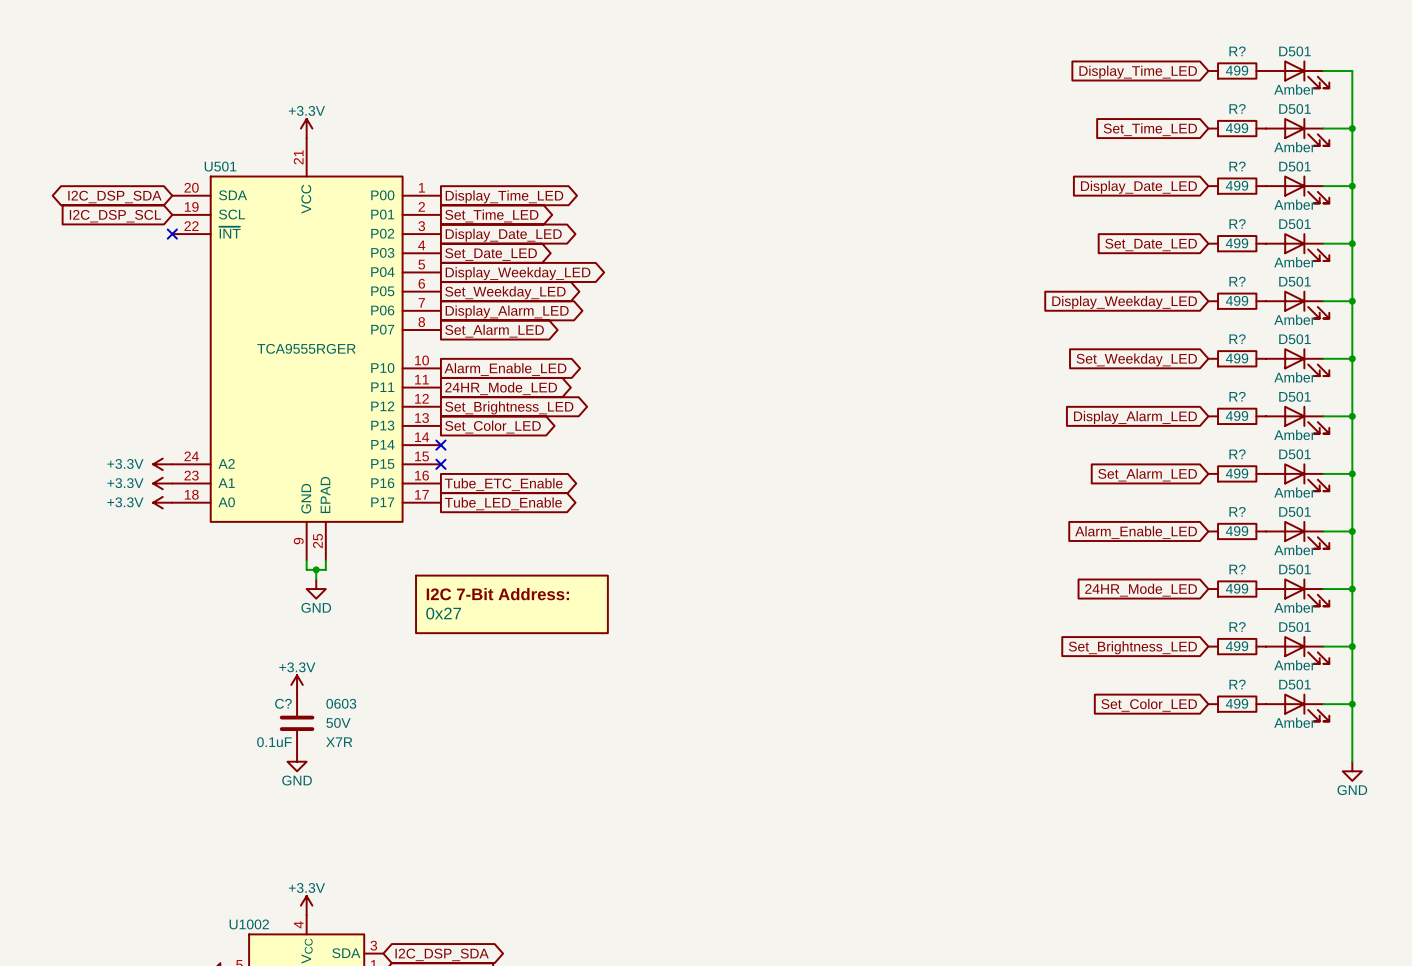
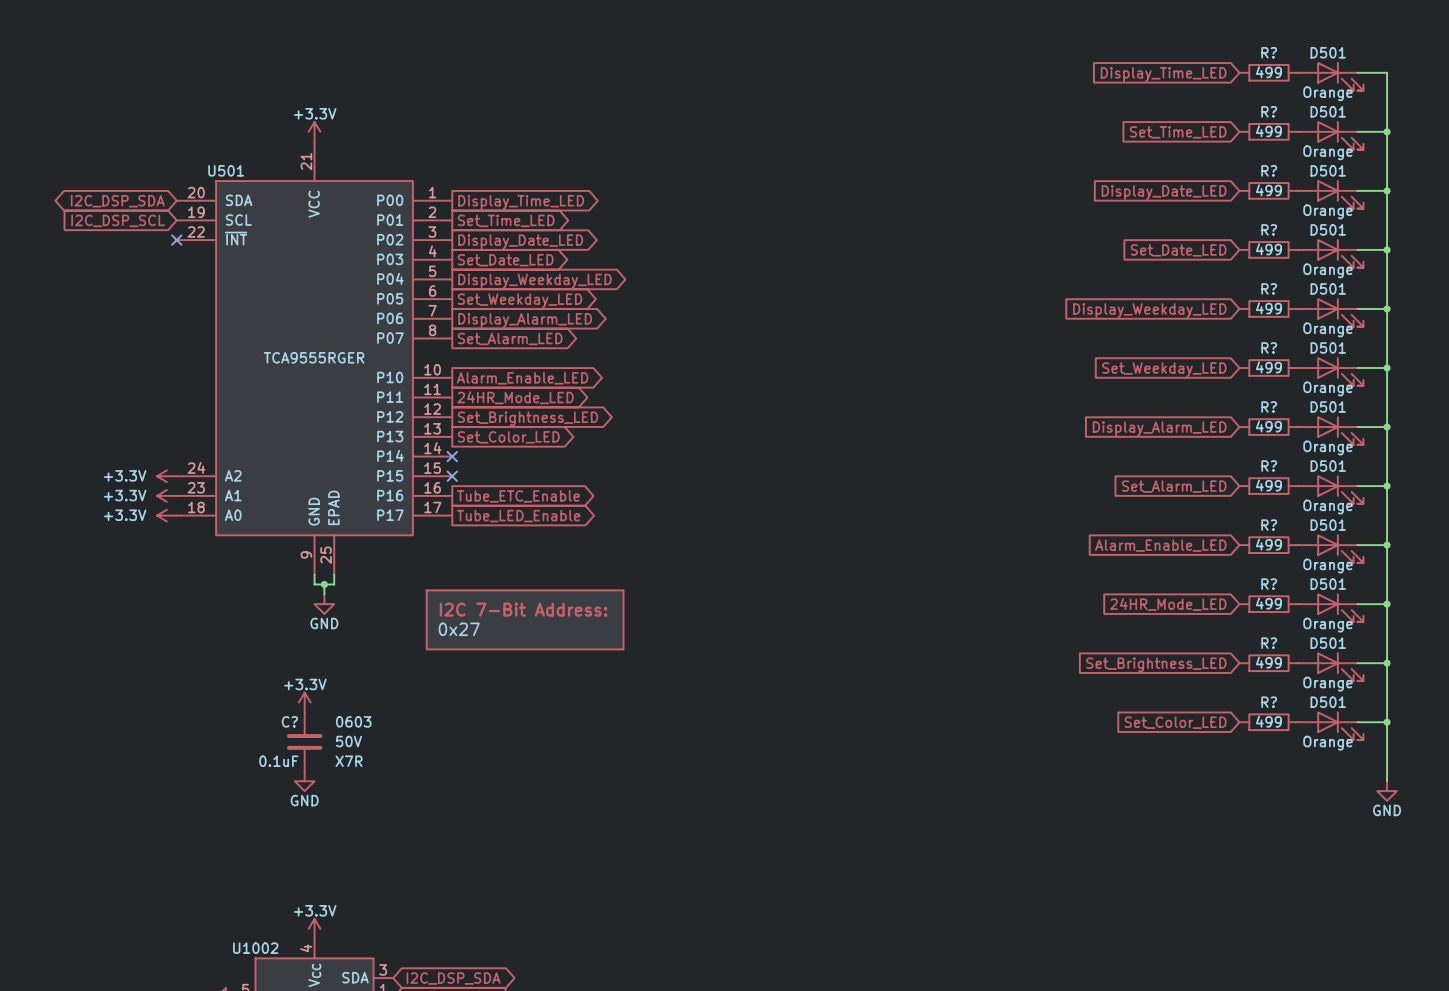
D501 value: Amber (1294, 89) -> Orange (1328, 93)
D501 value: Amber (1294, 147) -> Orange (1328, 152)
D501 value: Amber (1294, 204) -> Orange (1328, 211)
D501 value: Amber (1294, 262) -> Orange (1328, 270)
D501 value: Amber (1294, 319) -> Orange (1328, 329)
D501 value: Amber (1294, 377) -> Orange (1328, 388)
D501 value: Amber (1294, 434) -> Orange (1328, 447)
D501 value: Amber (1294, 492) -> Orange (1328, 507)
D501 value: Amber (1294, 550) -> Orange (1328, 566)
D501 value: Amber (1294, 607) -> Orange (1328, 625)
D501 value: Amber (1294, 665) -> Orange (1328, 684)
D501 value: Amber (1294, 722) -> Orange (1328, 743)

